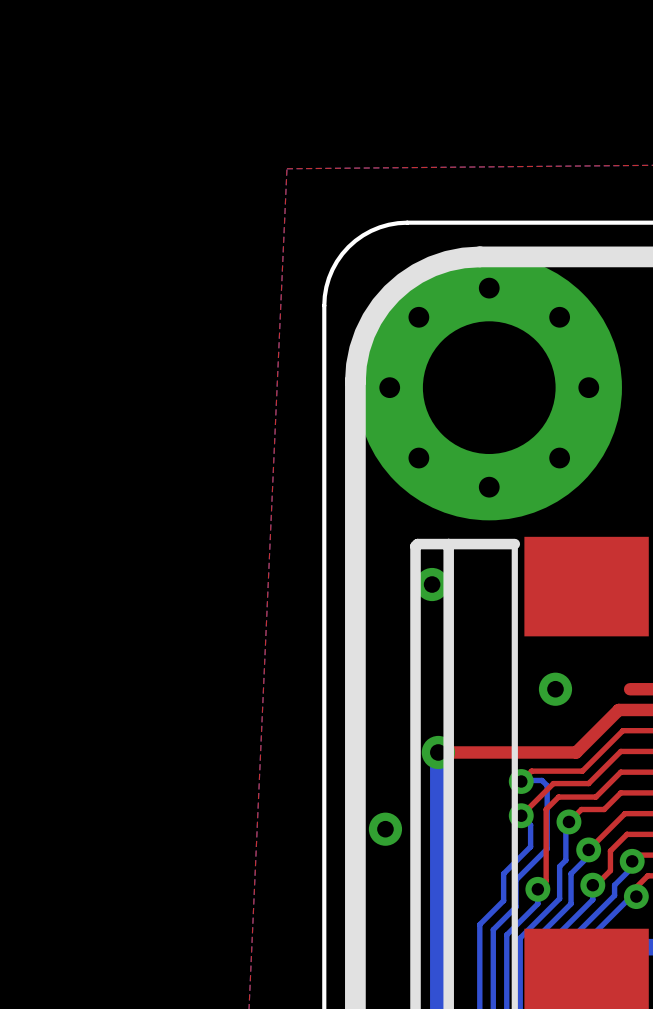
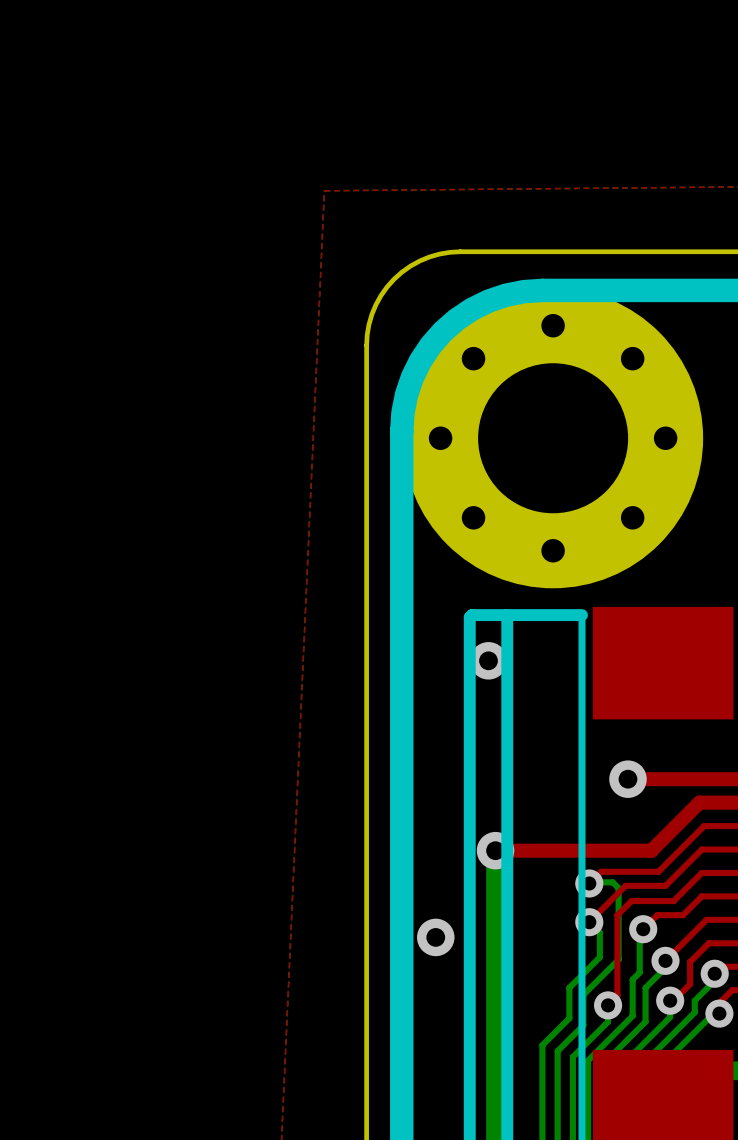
top track: none -> (627, 779) (712, 779)

